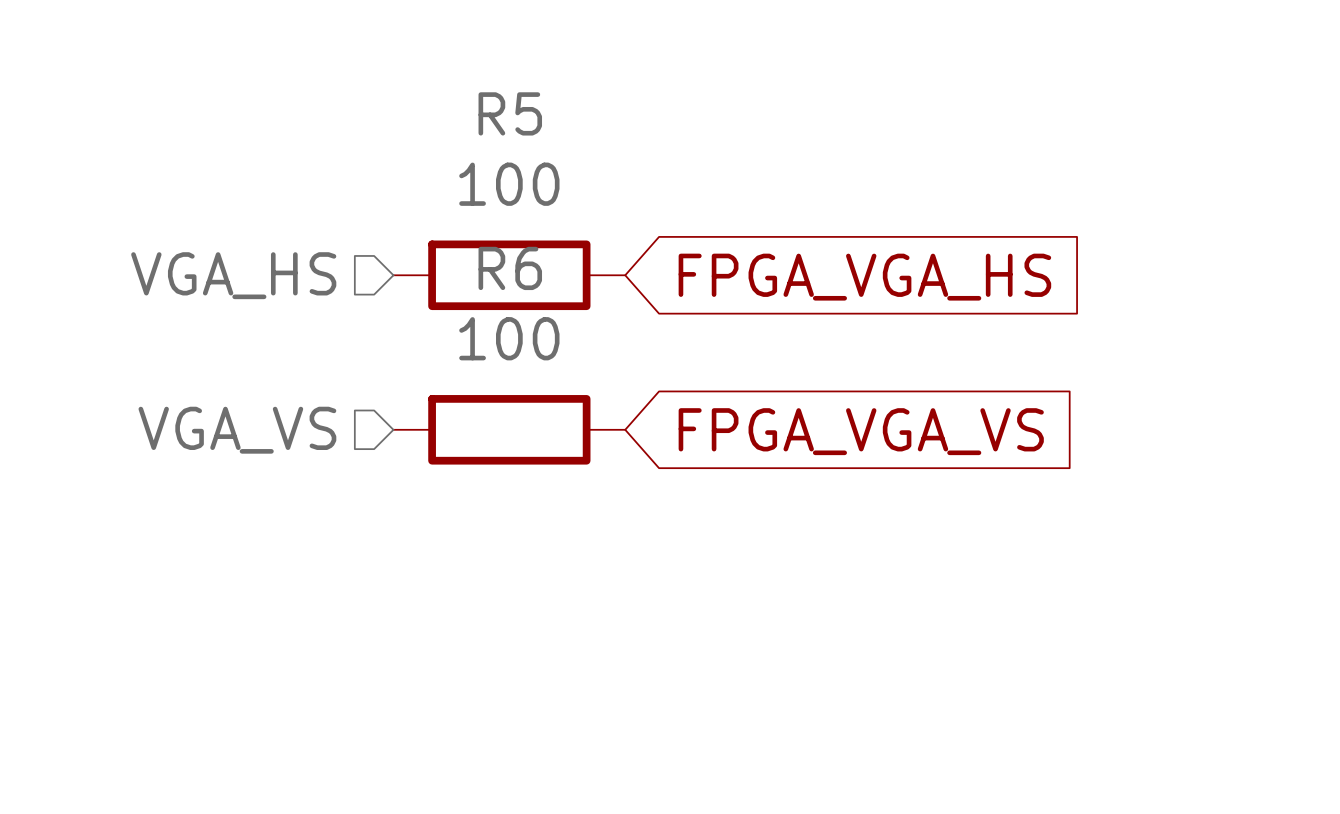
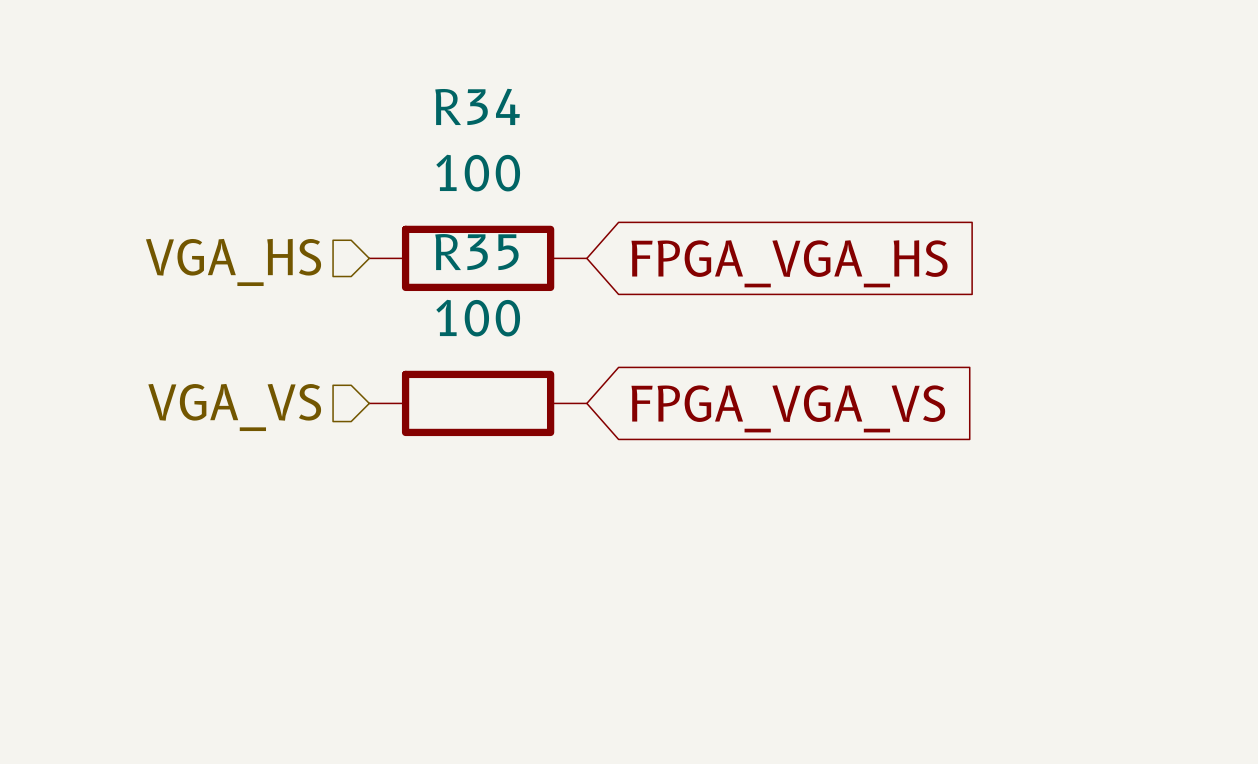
R5 name: R5 (510, 113) -> R34 (477, 106)
R6 name: R6 (510, 268) -> R35 (476, 252)

